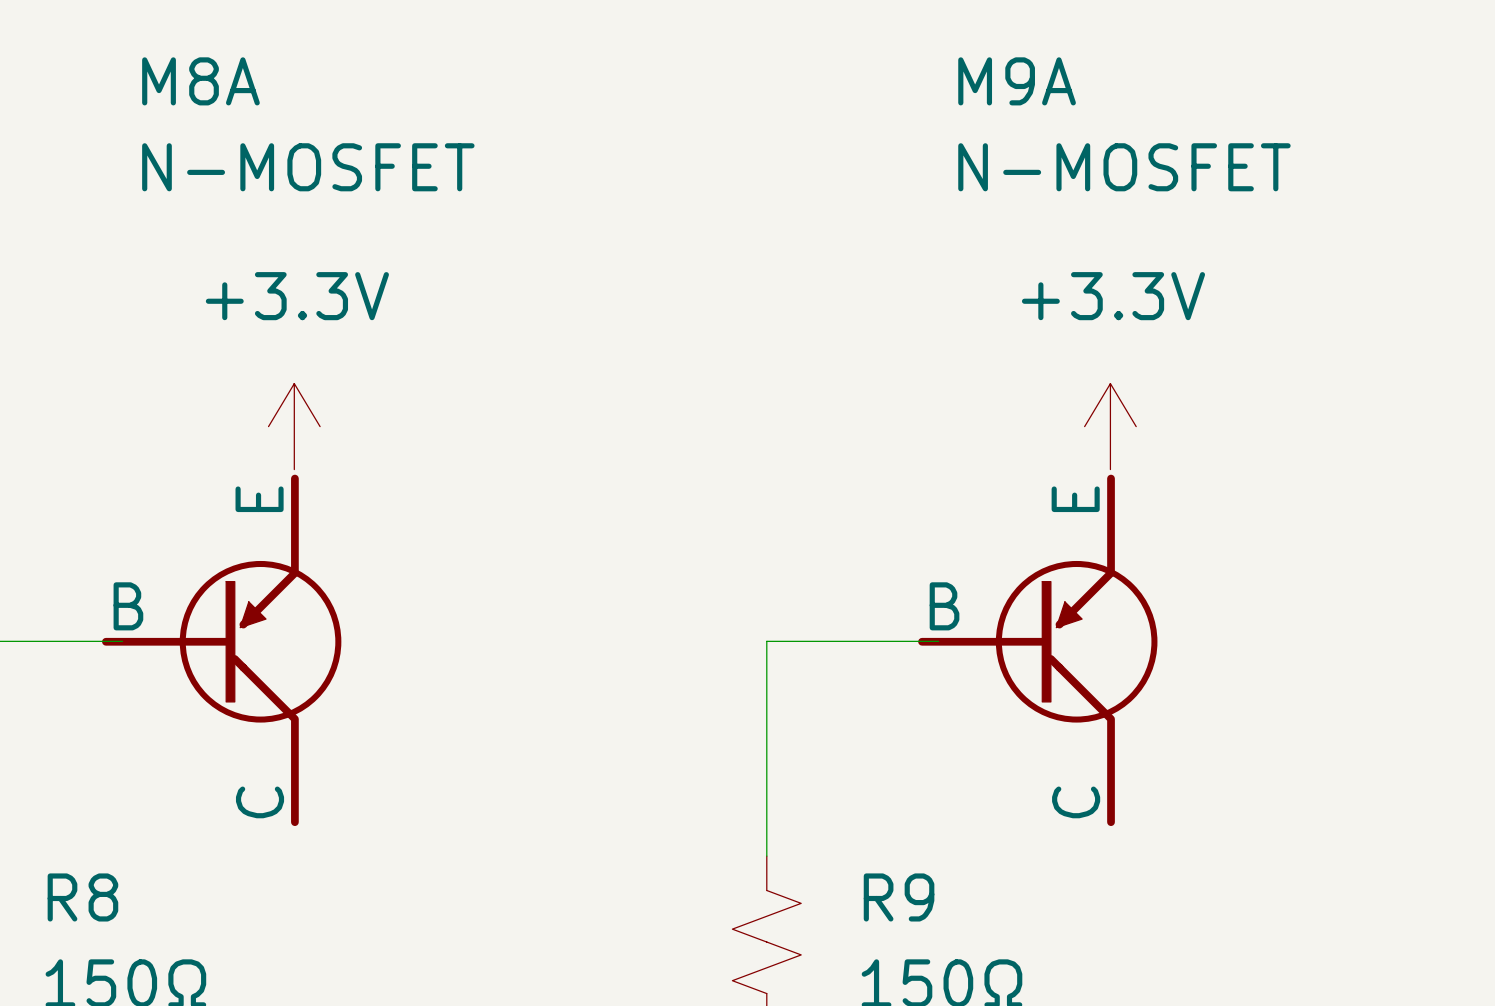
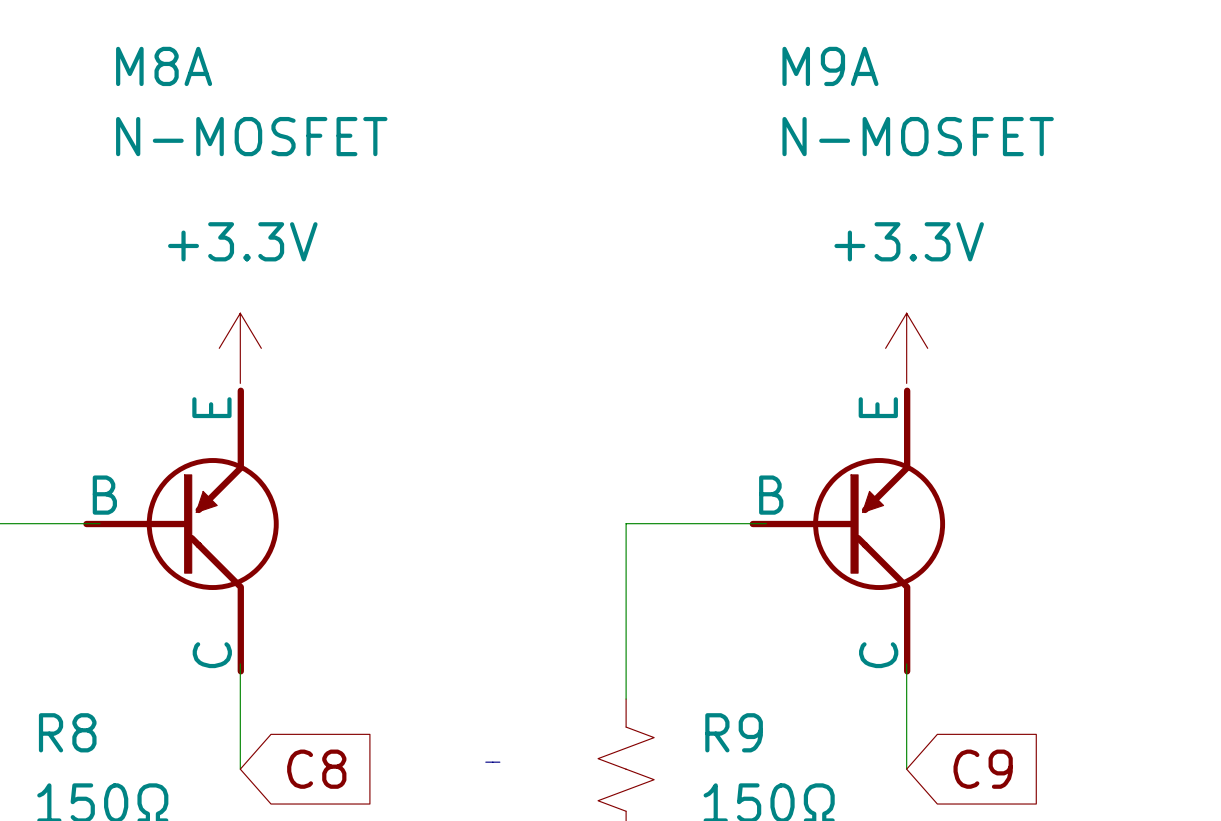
wire: none -> (240, 663) (240, 769)
wire: none -> (906, 663) (906, 769)
line: none -> (485, 762) (499, 762)
global label: none -> C8 (316, 769)
global label: none -> C9 (983, 769)

